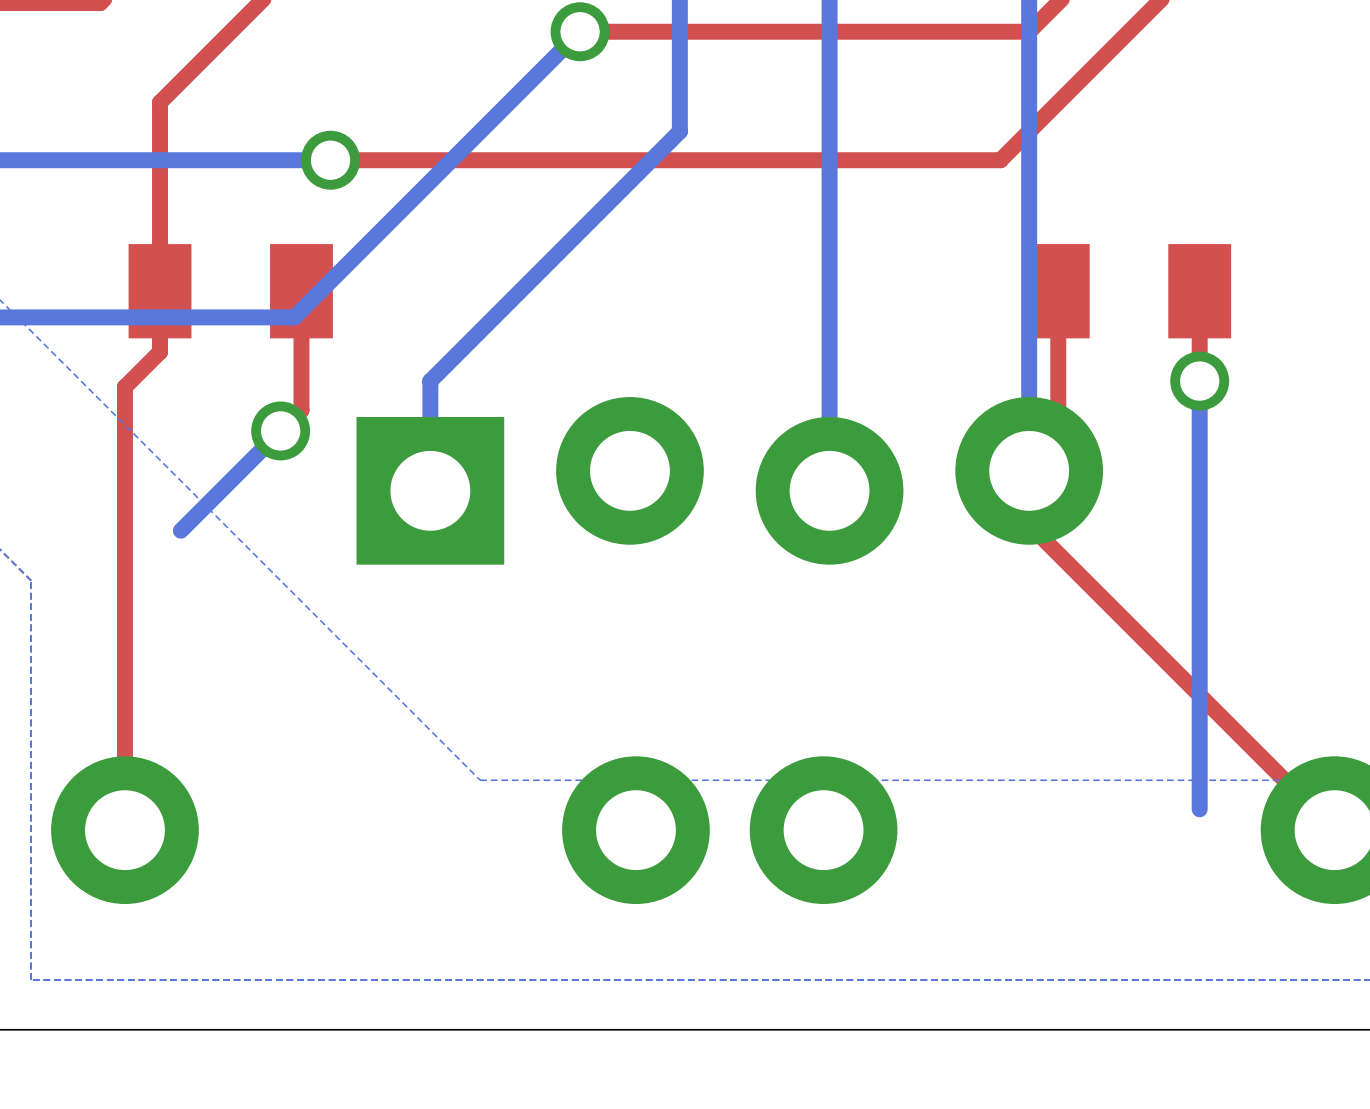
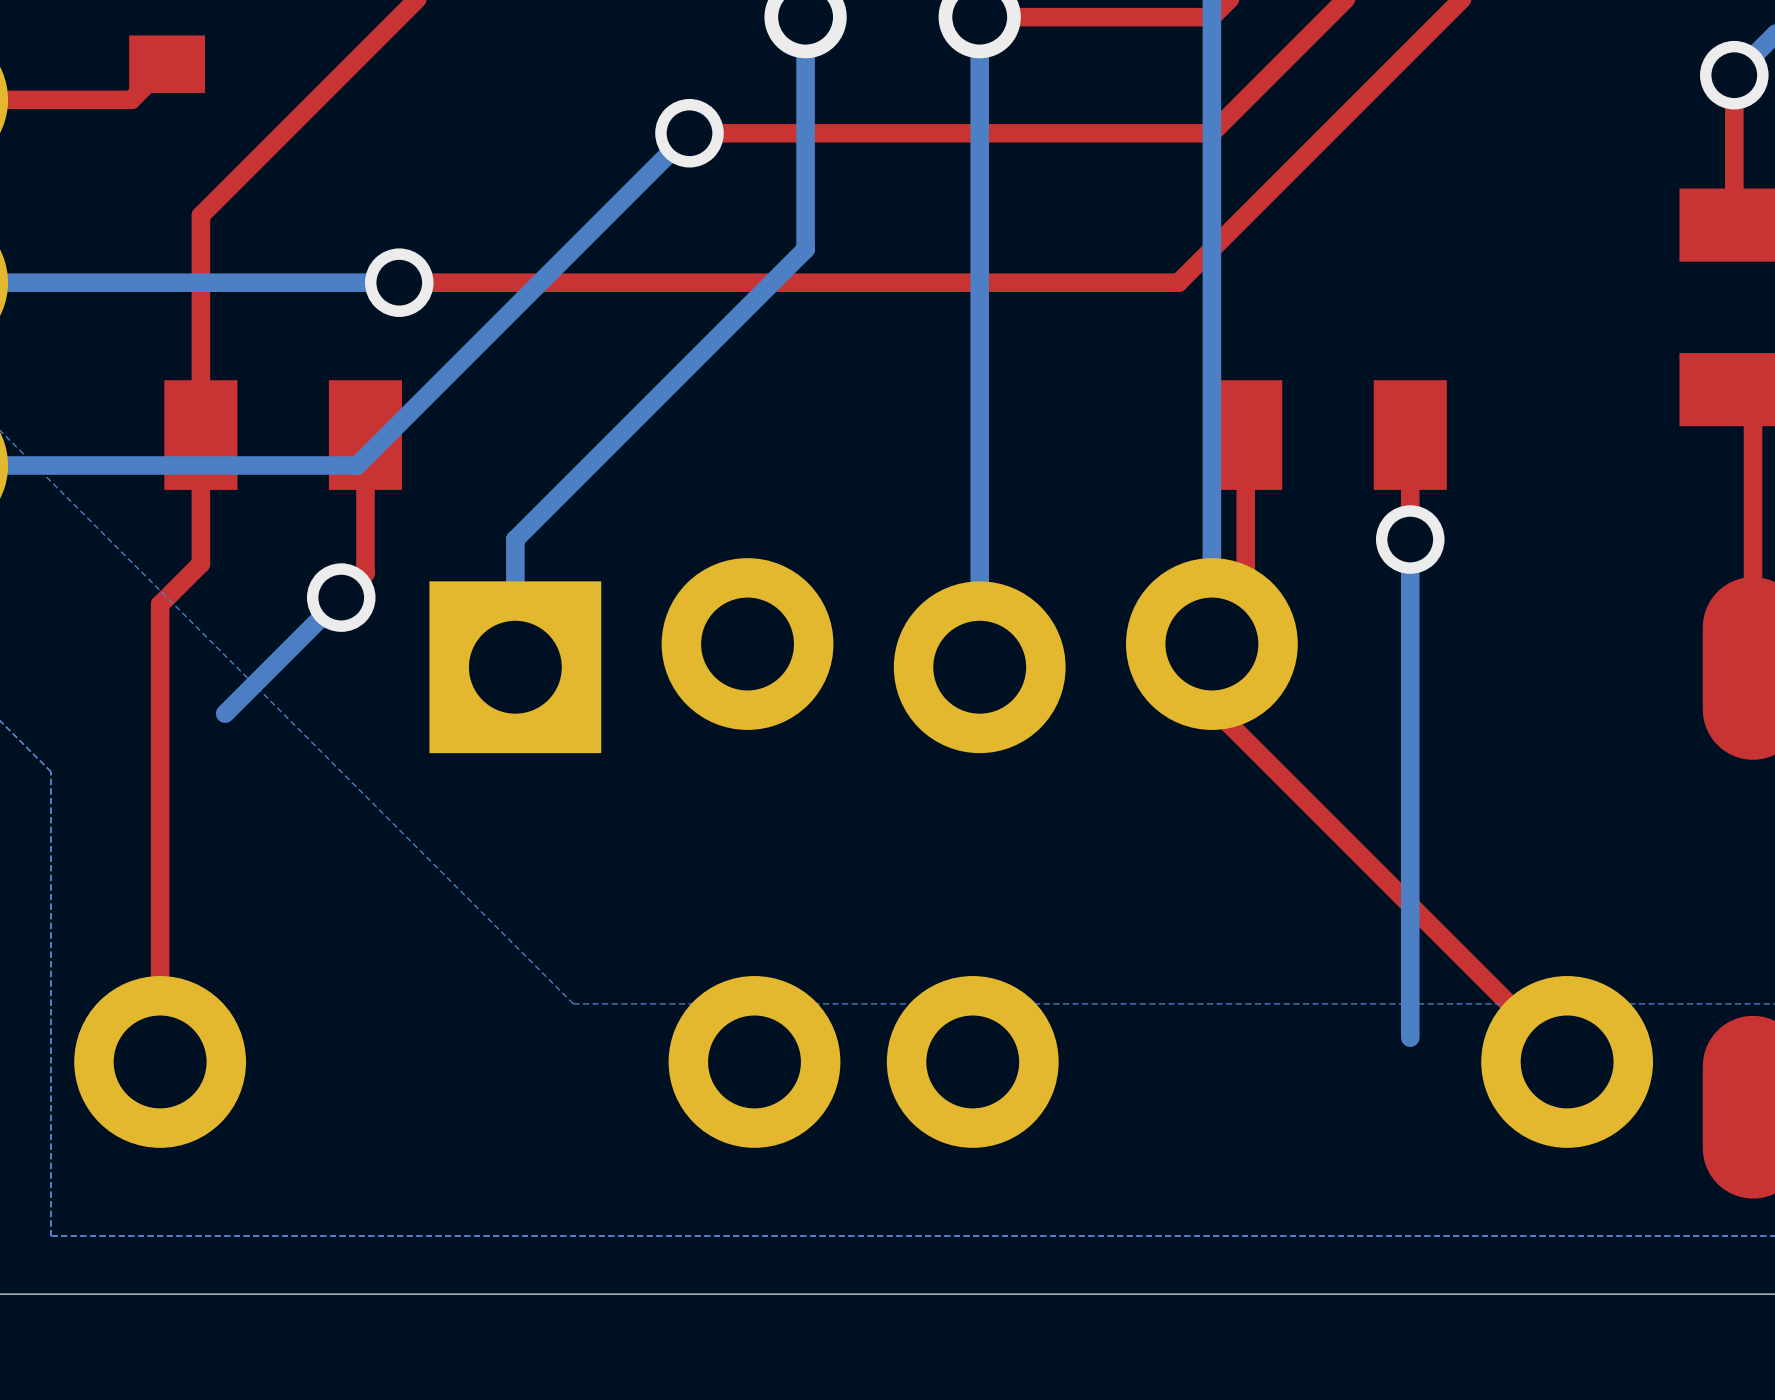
top track: (160, 351) (124, 387) (124, 436) -> (200, 505) (200, 563) (160, 604)

